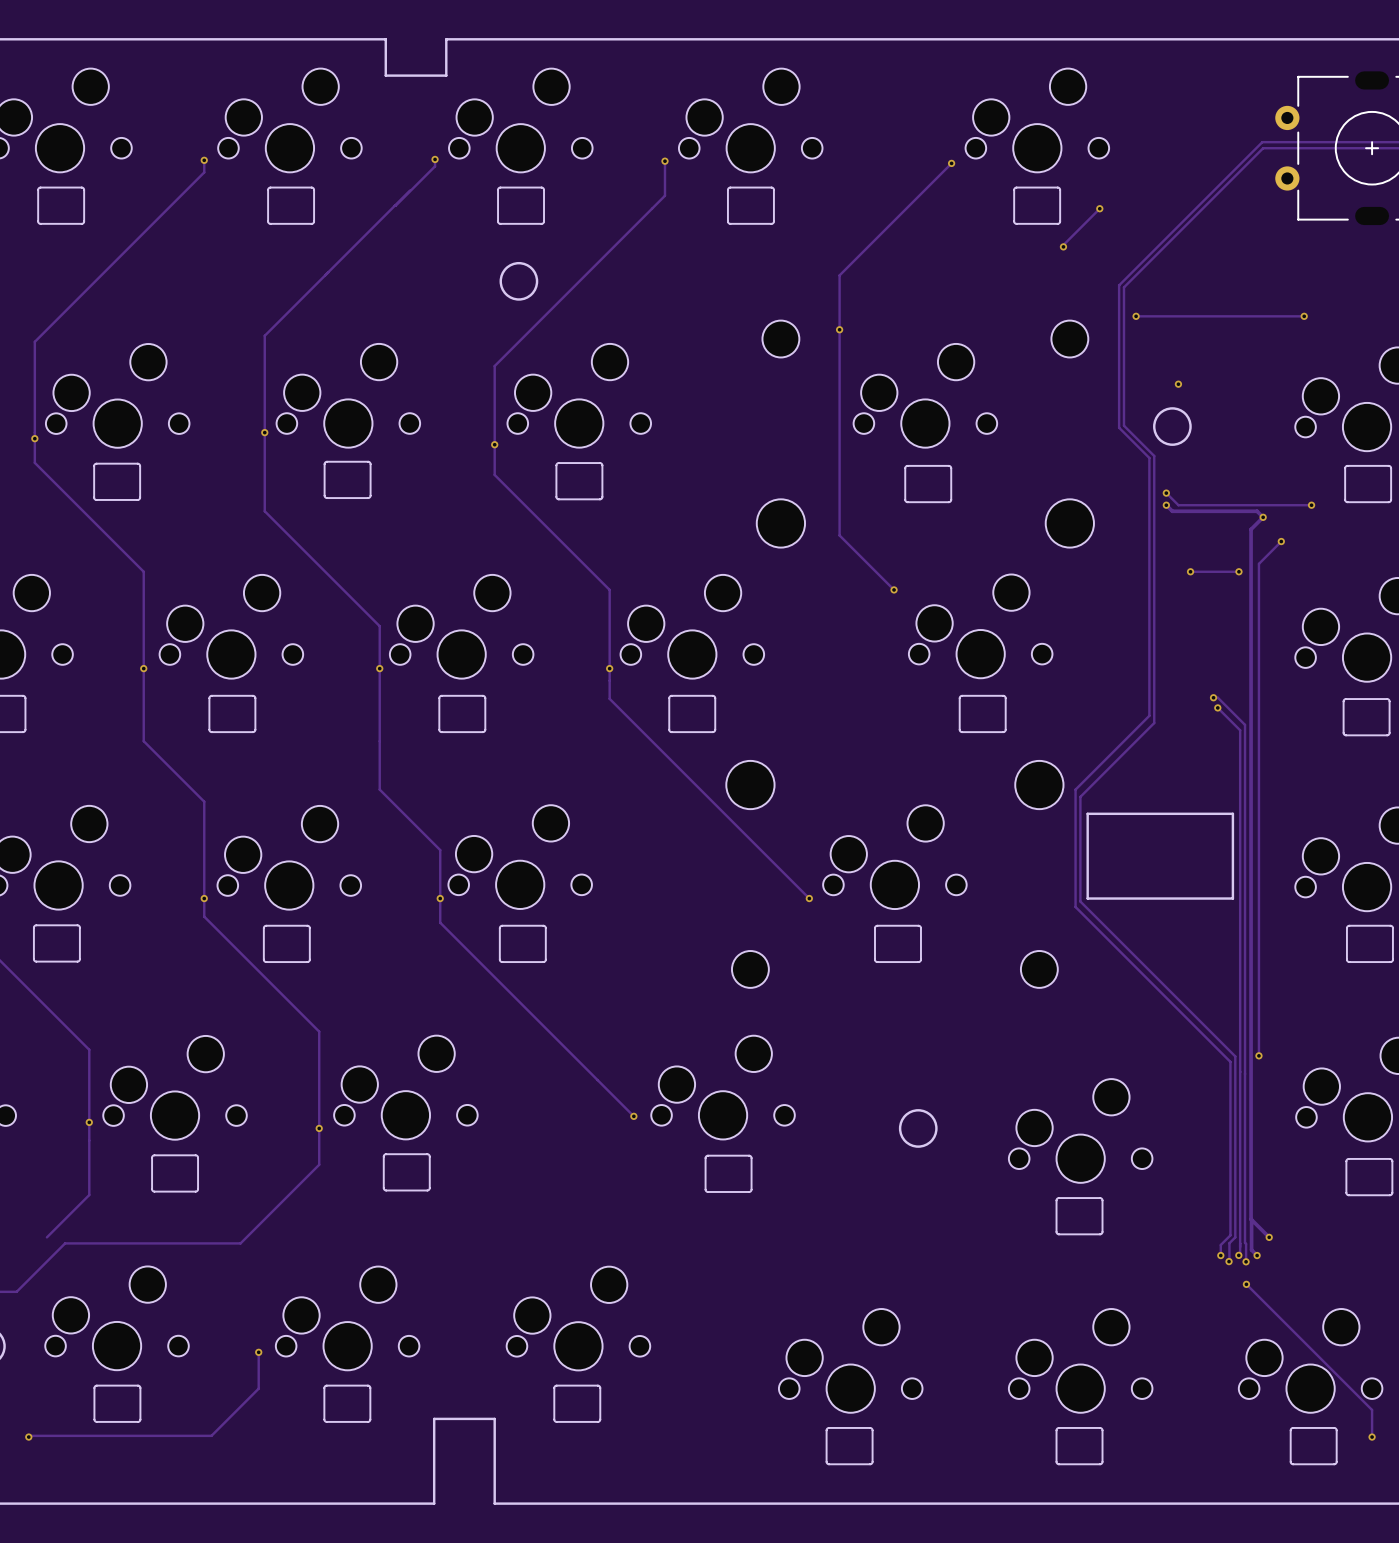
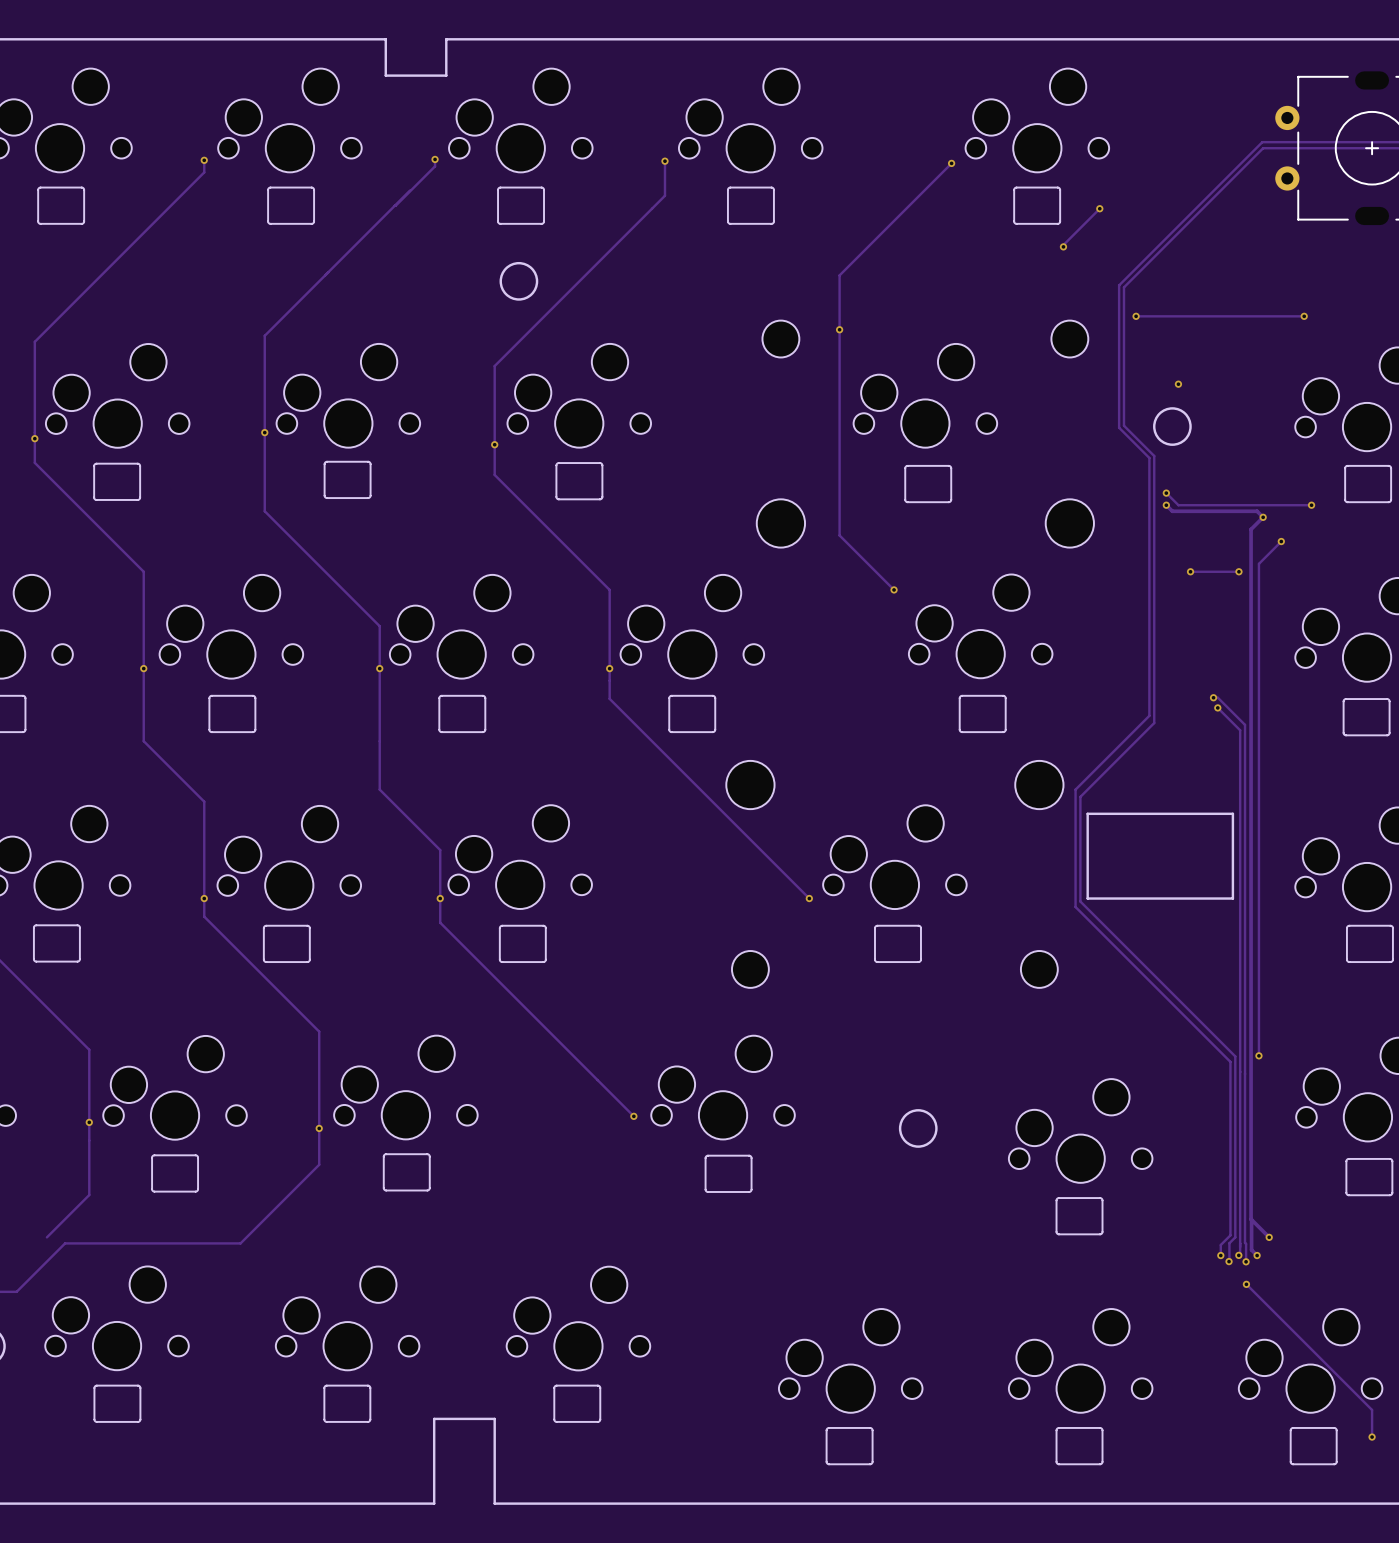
track: (258, 1352) (258, 1388) (211, 1435) (28, 1437) -> none
via: (258, 1352) -> none
via: (28, 1437) -> none

